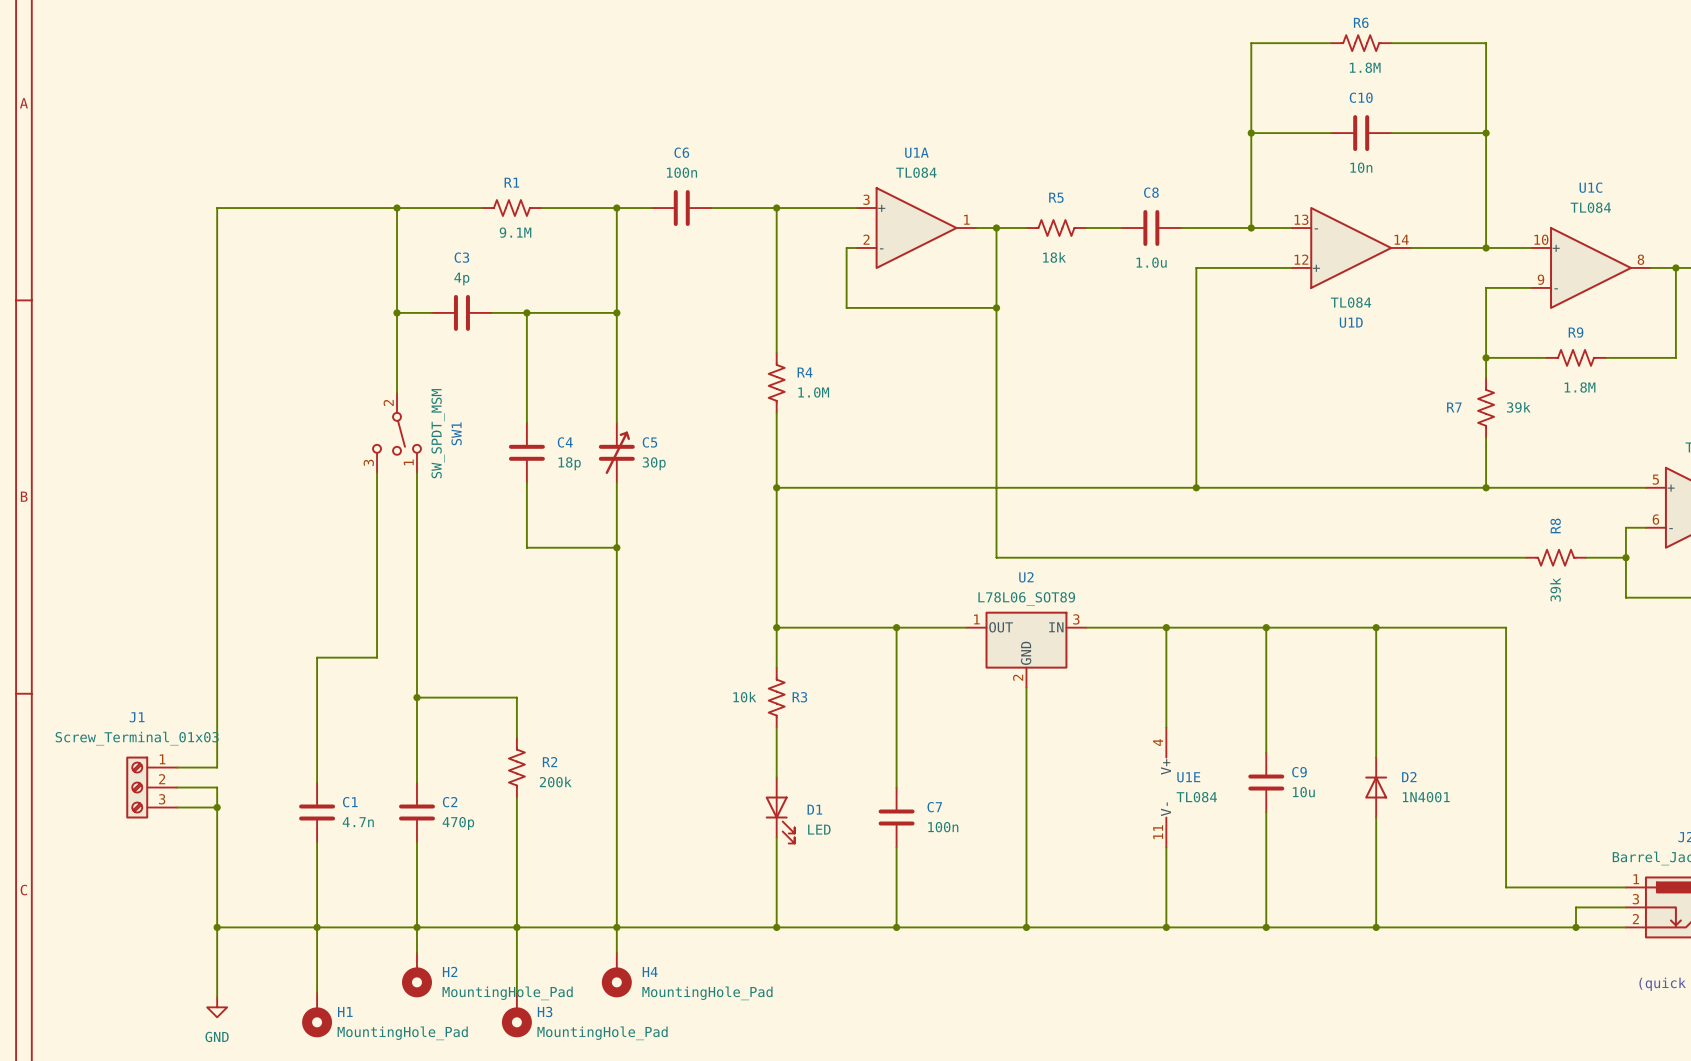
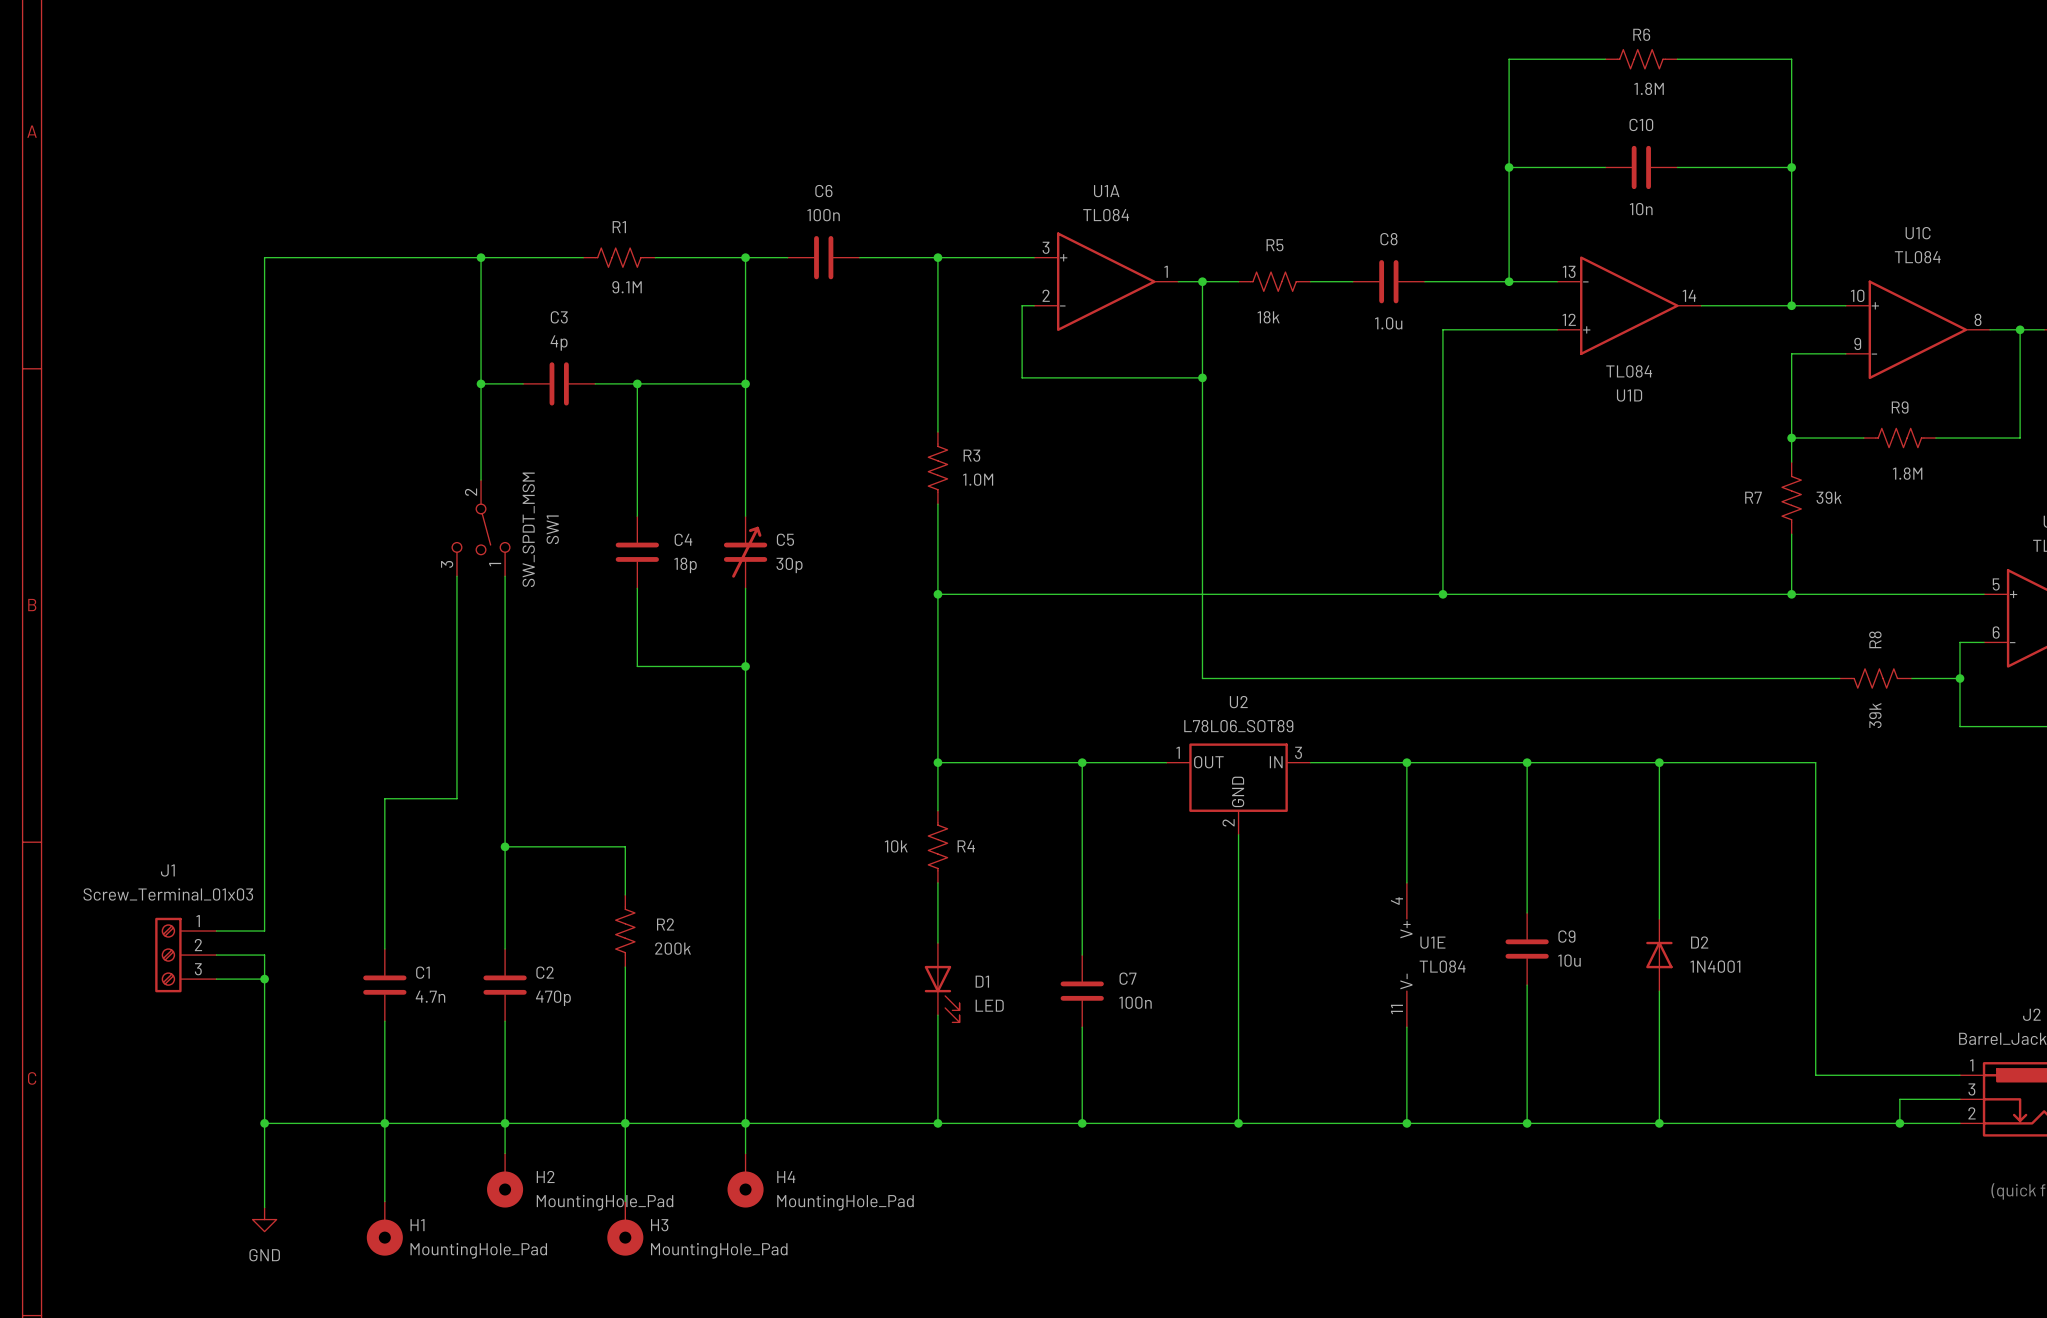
R4 name: R4 (805, 372) -> R3 (971, 455)
R3 name: R3 (799, 697) -> R4 (966, 846)

